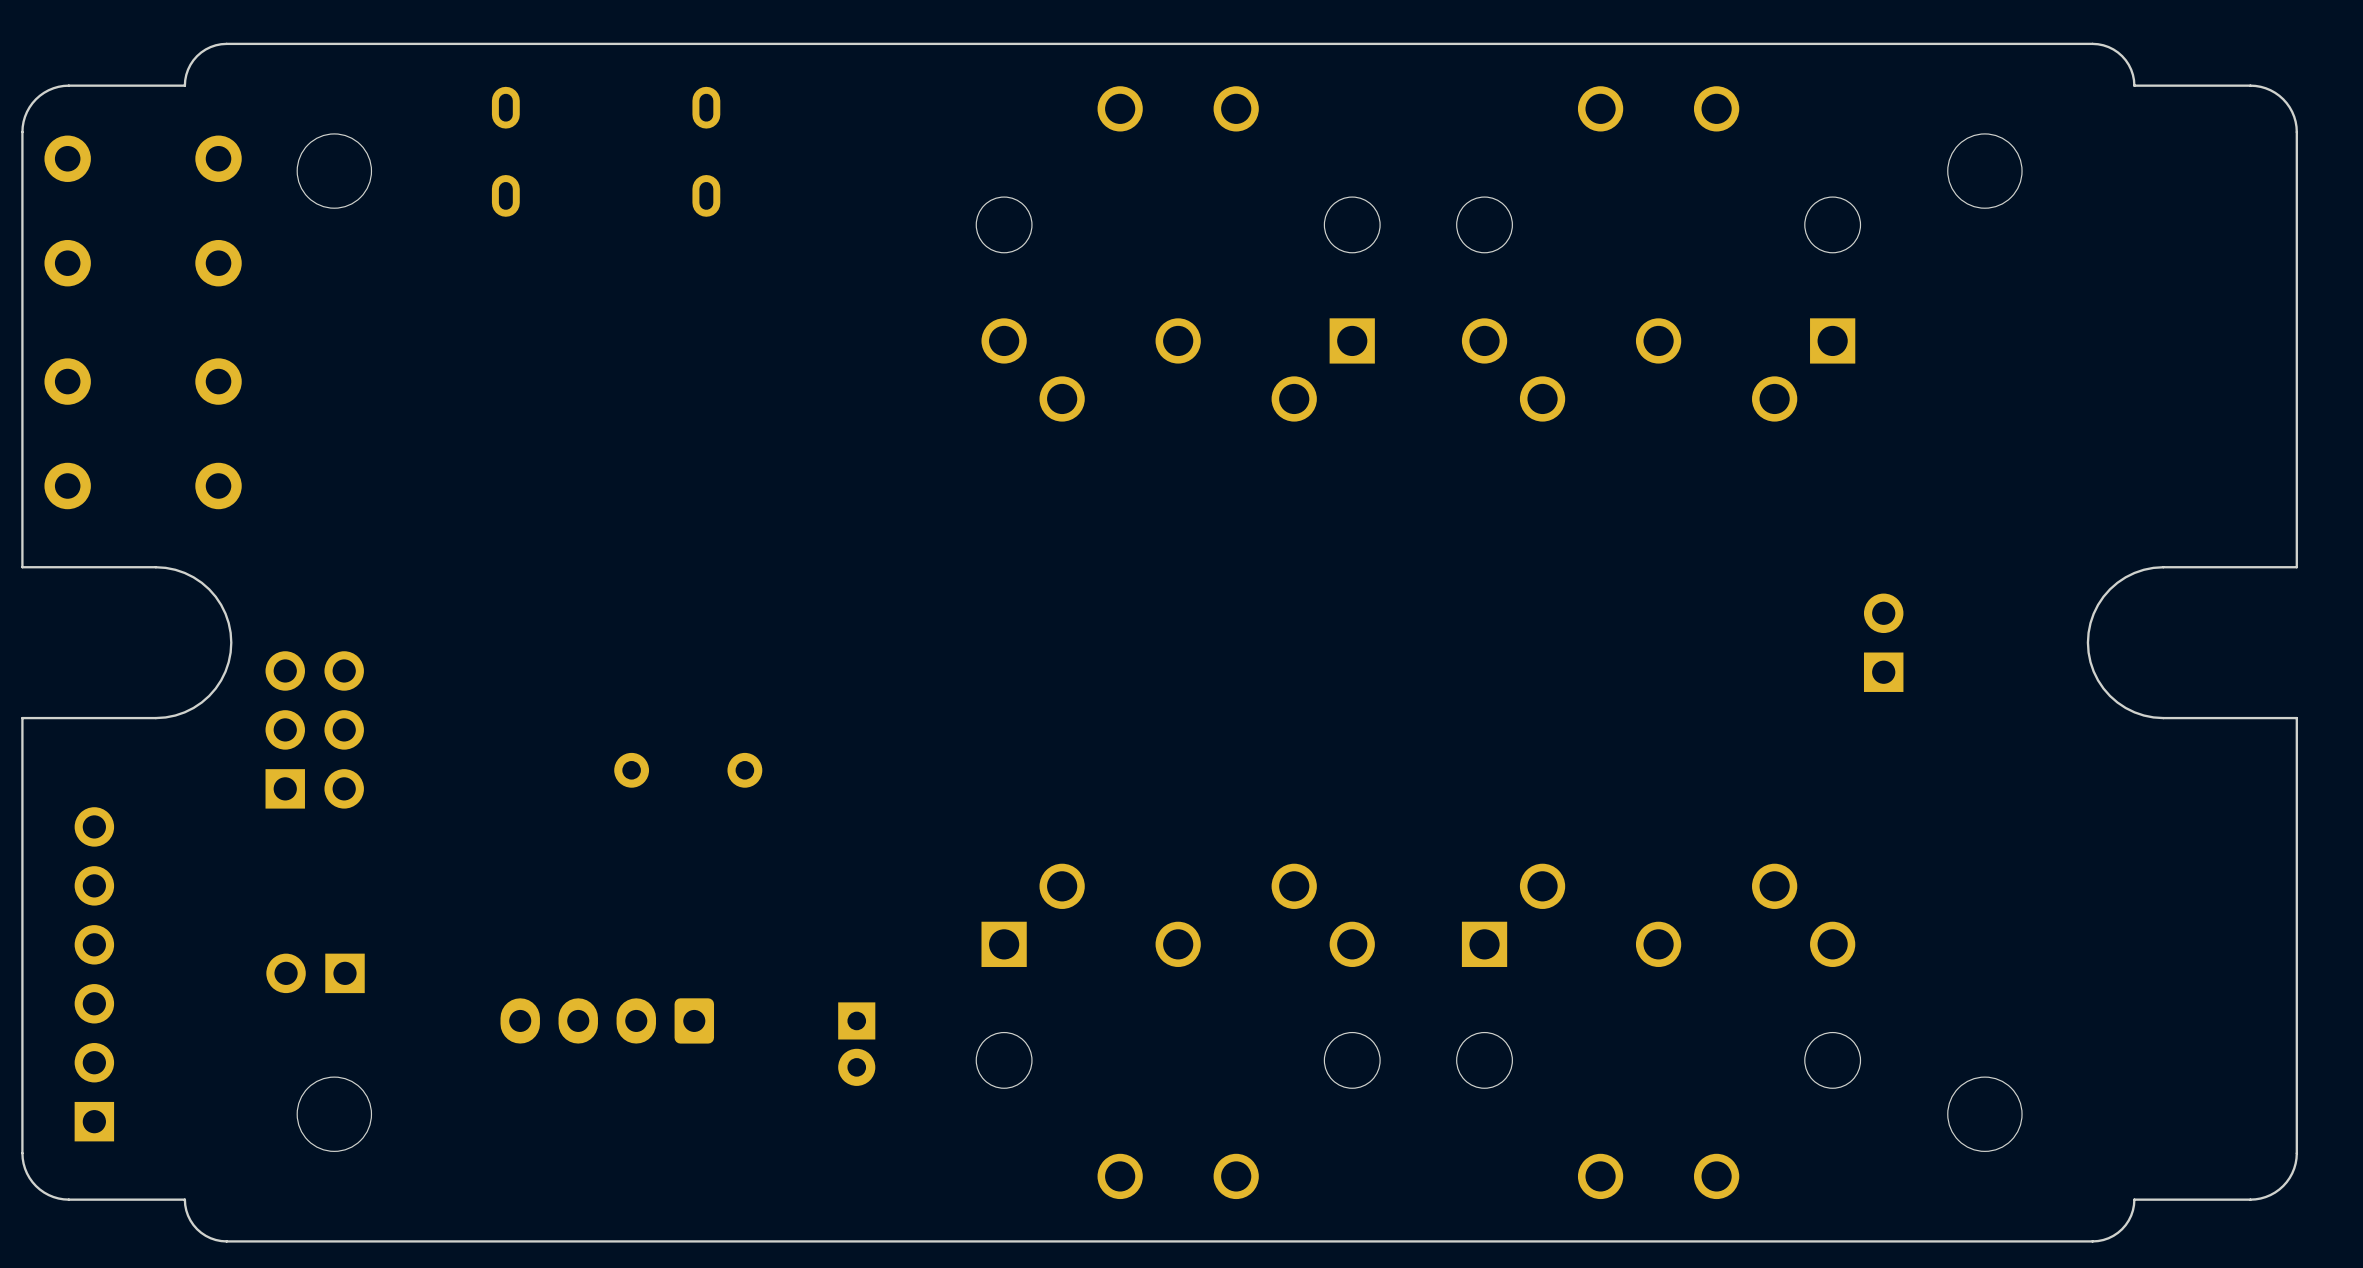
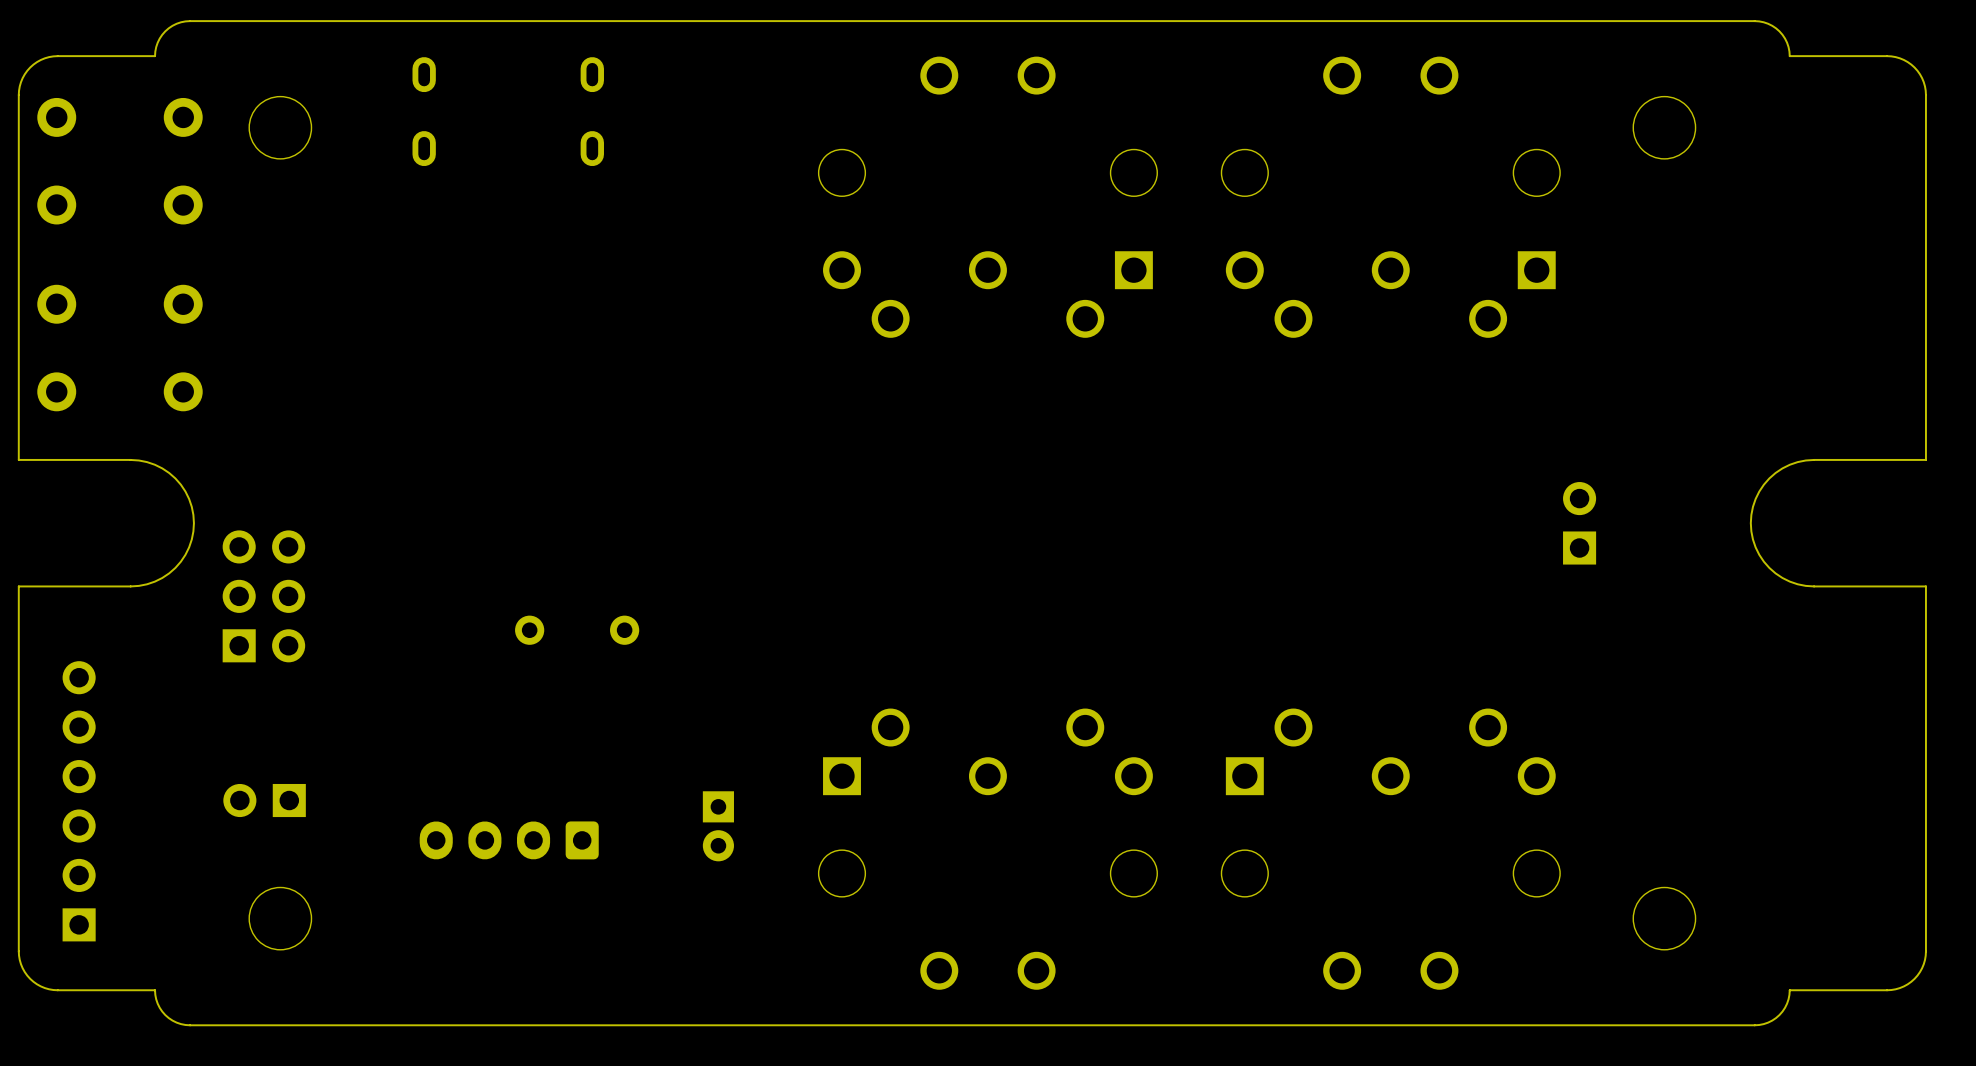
part position: (856, 1044) -> (718, 826)

